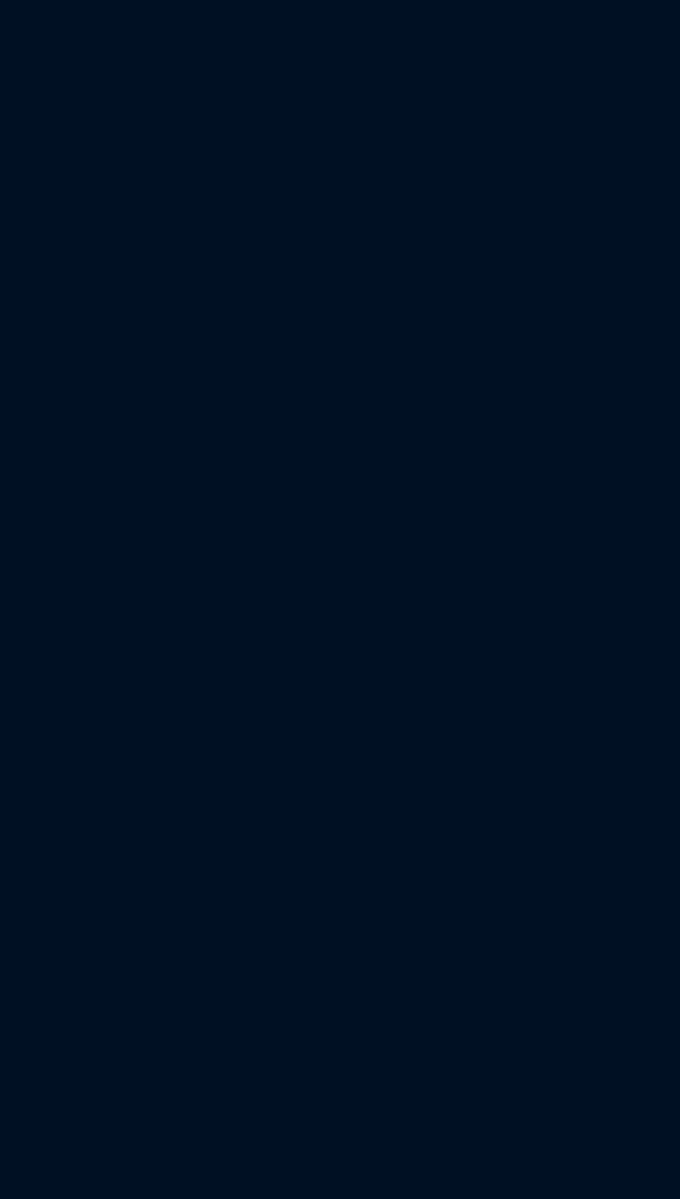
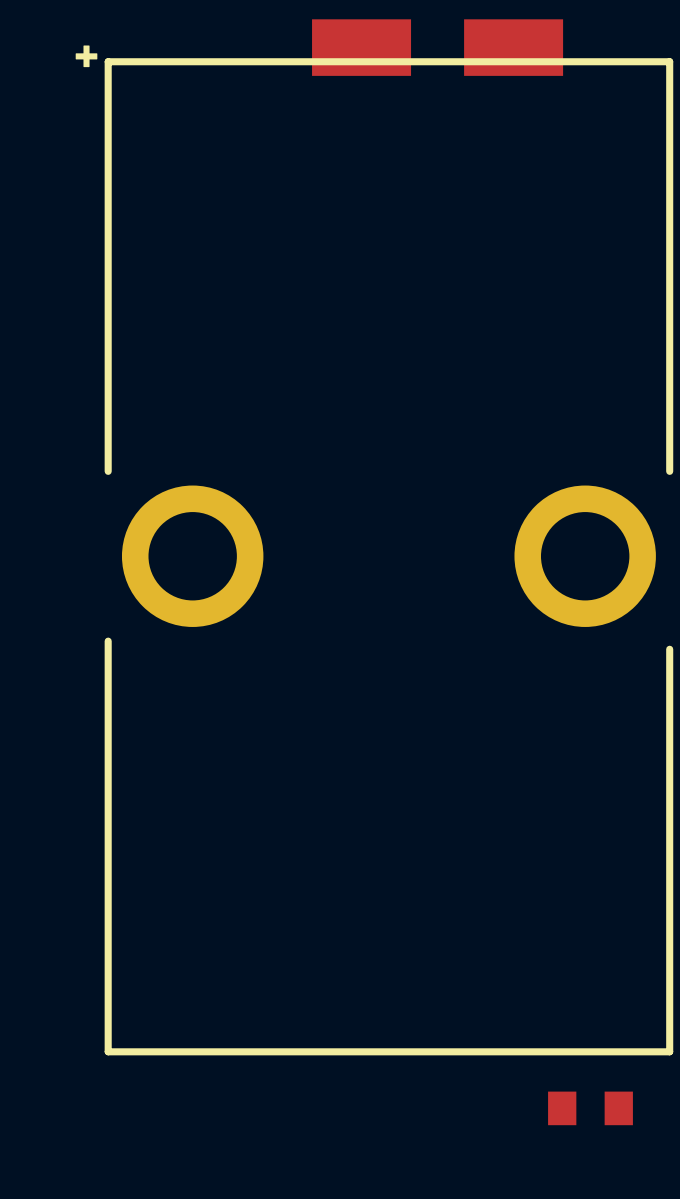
part: none -> (437, 47)
text: none -> + (86, 56)
part: none -> (388, 556)
part: none -> (590, 1108)

